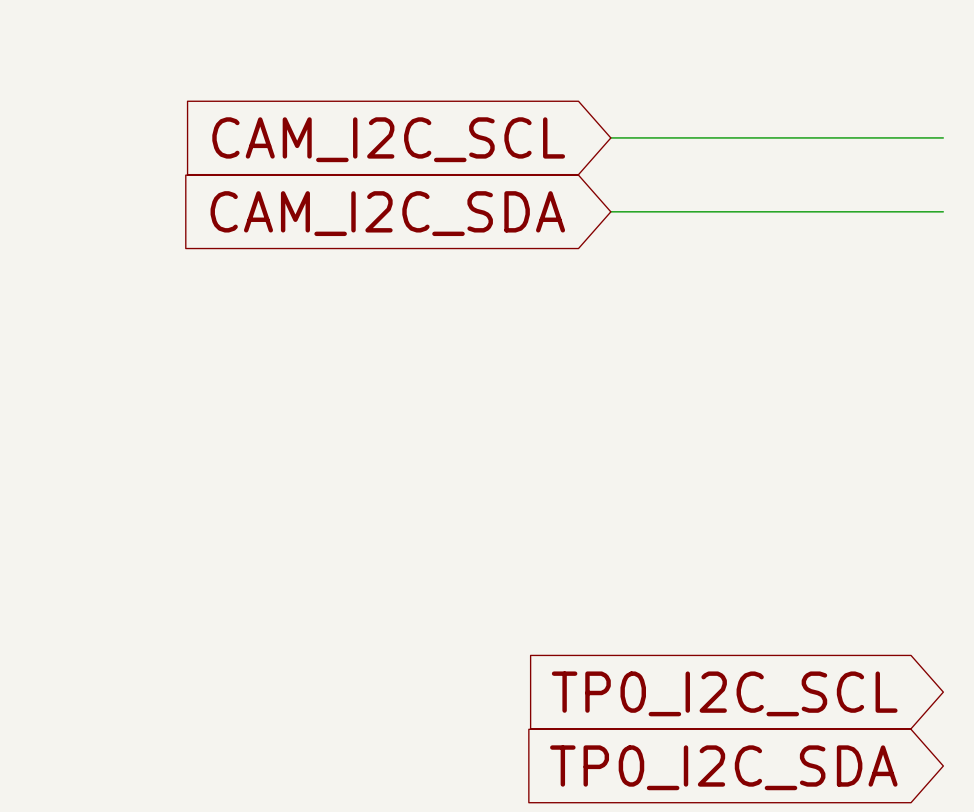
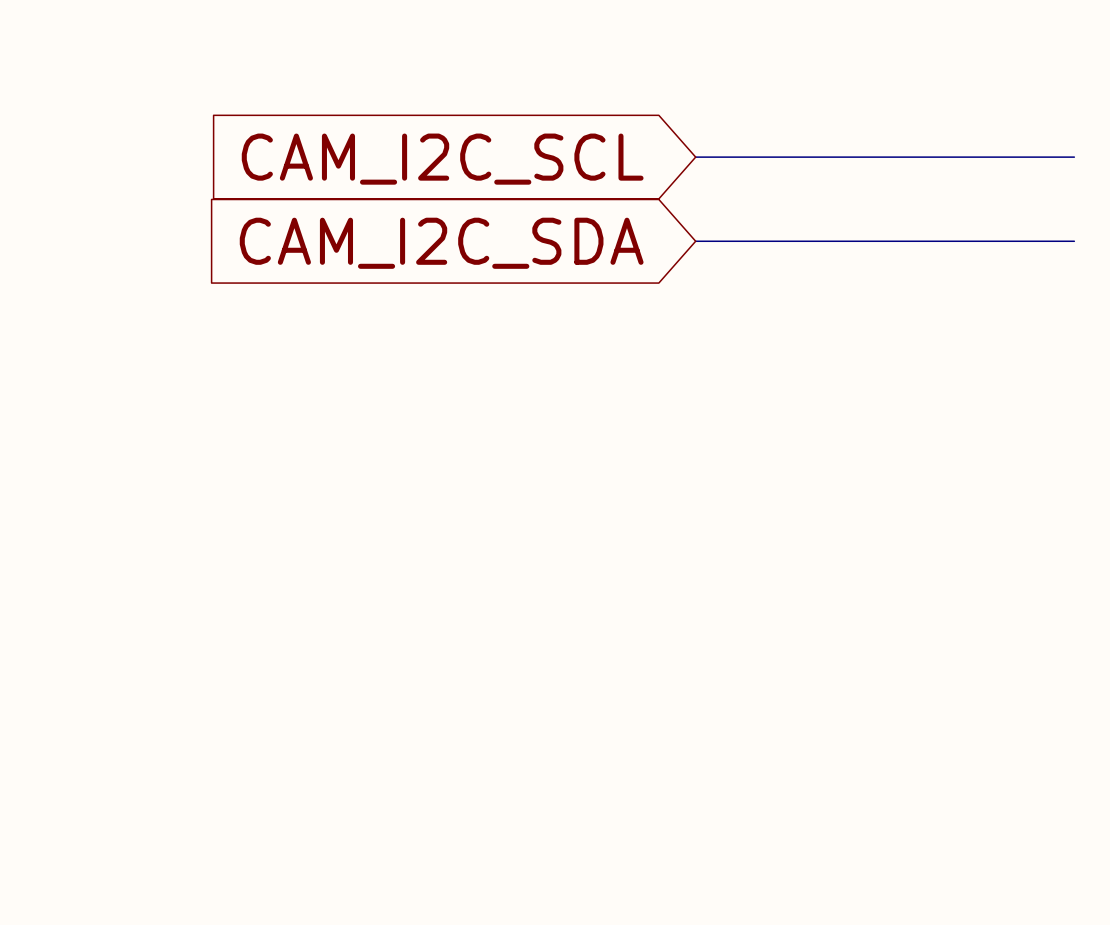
global label: TP0_I2C_SCL (724, 693) -> none
global label: TP0_I2C_SDA (723, 767) -> none

